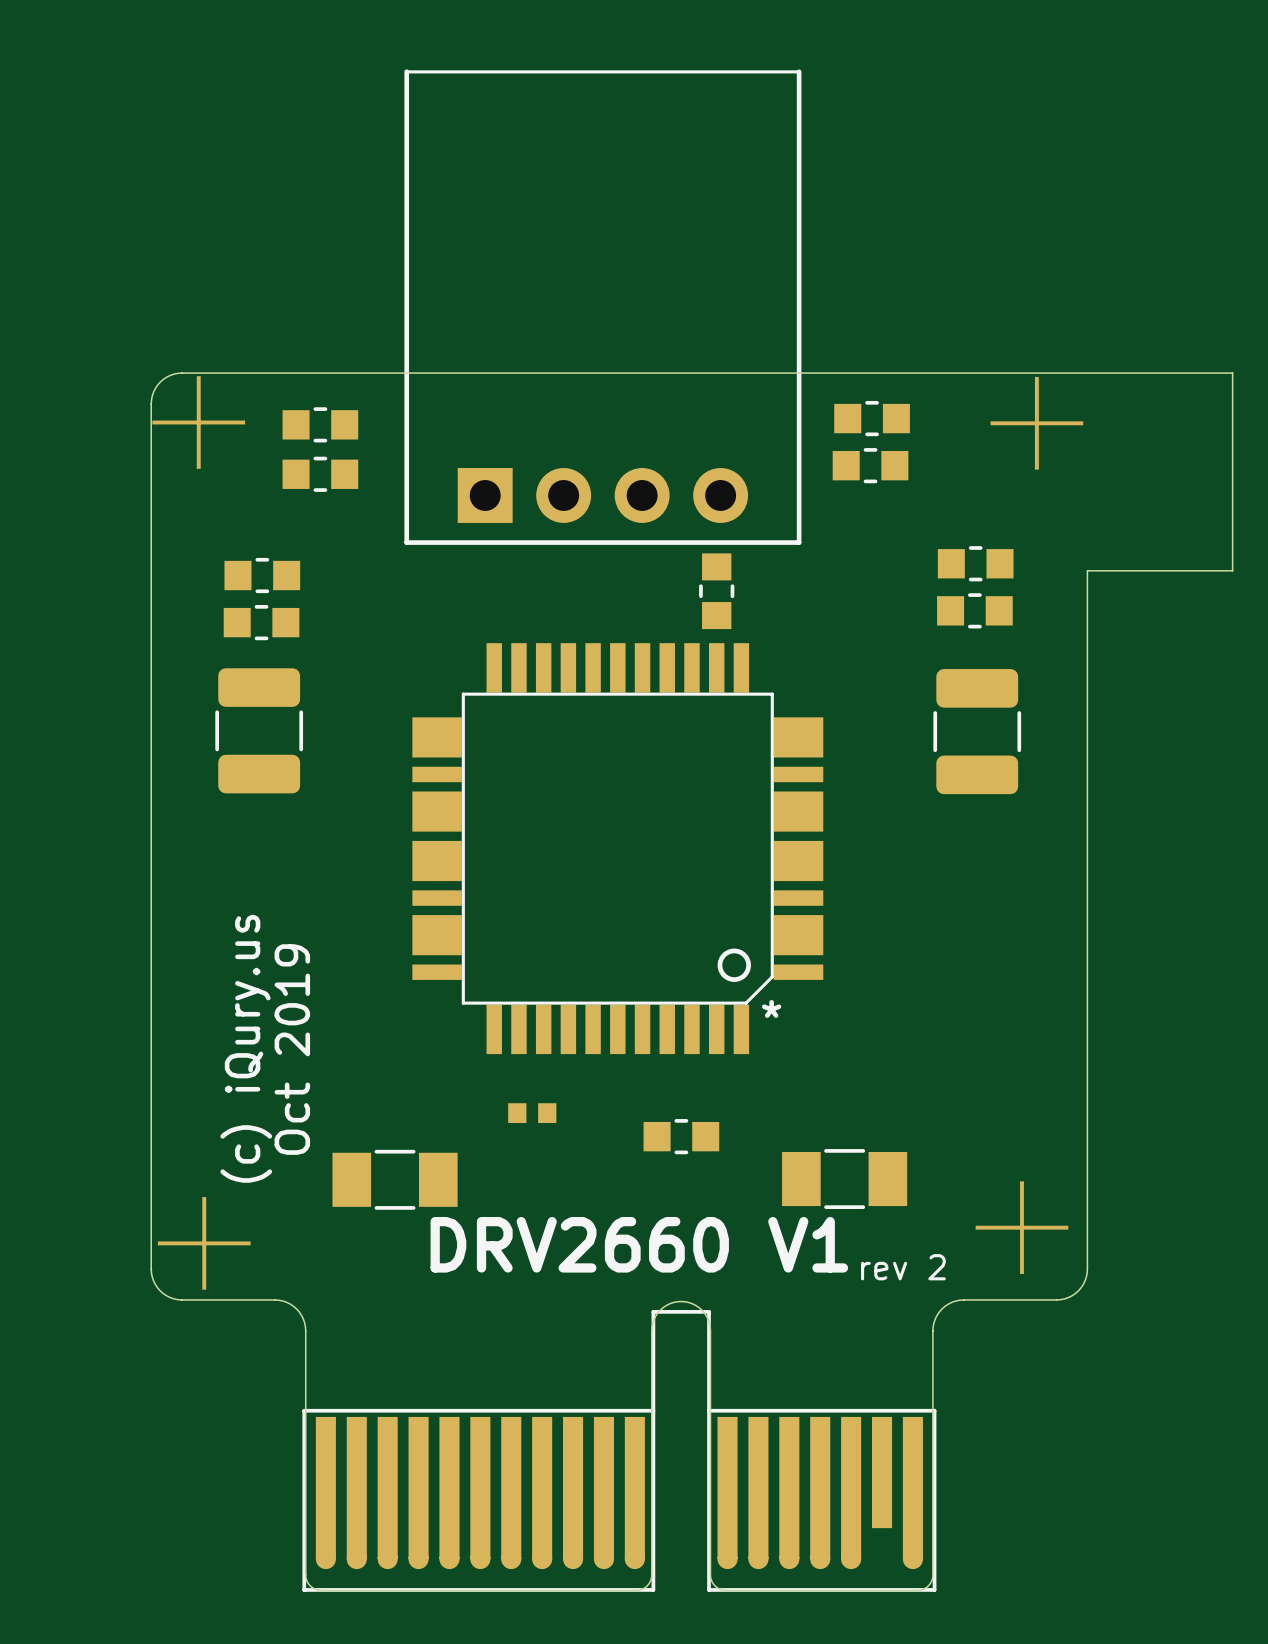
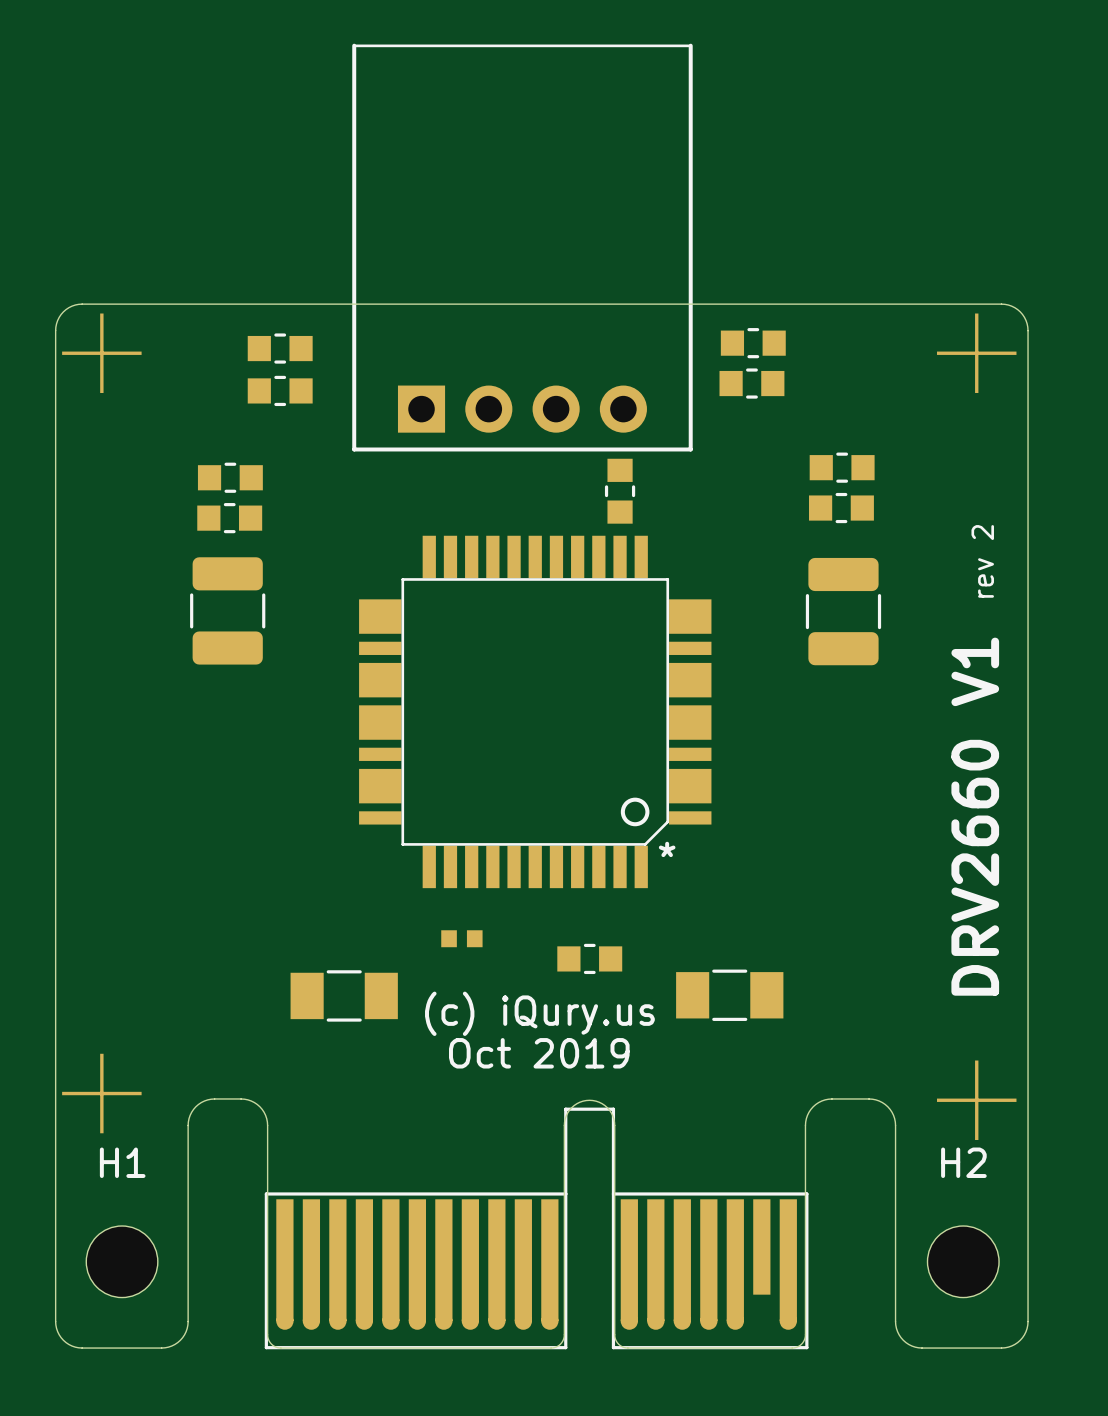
board edge: (182, 373) (170, 375) (160, 382) (153, 392) (151, 403) (151, 1273) (153, 1280) (160, 1290) (174, 1298) (243, 1299) -> (161, 304) (75, 305) (63, 311) (55, 327) (55, 1321) (59, 1334) (68, 1344) (82, 1348) (165, 1347) (177, 1342) (184, 1334) (188, 1321) (188, 1122) (195, 1106) (204, 1101) (214, 1098)
board edge: (1161, 373) (1232, 373) (1232, 570) (1087, 570) (1087, 1273) (1081, 1287) (1075, 1293) (1064, 1298) (1007, 1299) -> (1001, 304) (1011, 306) (1020, 311) (1026, 320) (1028, 330) (1028, 1321) (1024, 1334) (1014, 1344) (1001, 1348) (918, 1347) (905, 1342) (899, 1334) (895, 1321) (895, 1122) (887, 1106) (879, 1101) (869, 1098)
part position: (198, 422) -> (101, 353)
part position: (1036, 423) -> (976, 353)
text rotation: 0° (246, 1048) -> 90° clockwise (539, 1013)
text position: (c) iQury.us (246, 1048) -> (c) iQury.us (539, 1013)
text rotation: 0° (292, 1049) -> 90° clockwise (539, 1053)
text position: Oct 2019 (292, 1049) -> Oct 2019 (539, 1053)
part position: (1021, 1227) -> (976, 1100)
part position: (204, 1243) -> (101, 1093)
text rotation: 0° (639, 1244) -> 90° counterclockwise (975, 816)
text position: DRV2660 V1 (639, 1244) -> DRV2660 V1 (975, 816)
text rotation: 0° (903, 1267) -> 90° counterclockwise (982, 561)
text position: rev 2 (903, 1267) -> rev 2 (982, 561)
H1: none -> (122, 1261)
H2: none -> (963, 1261)

